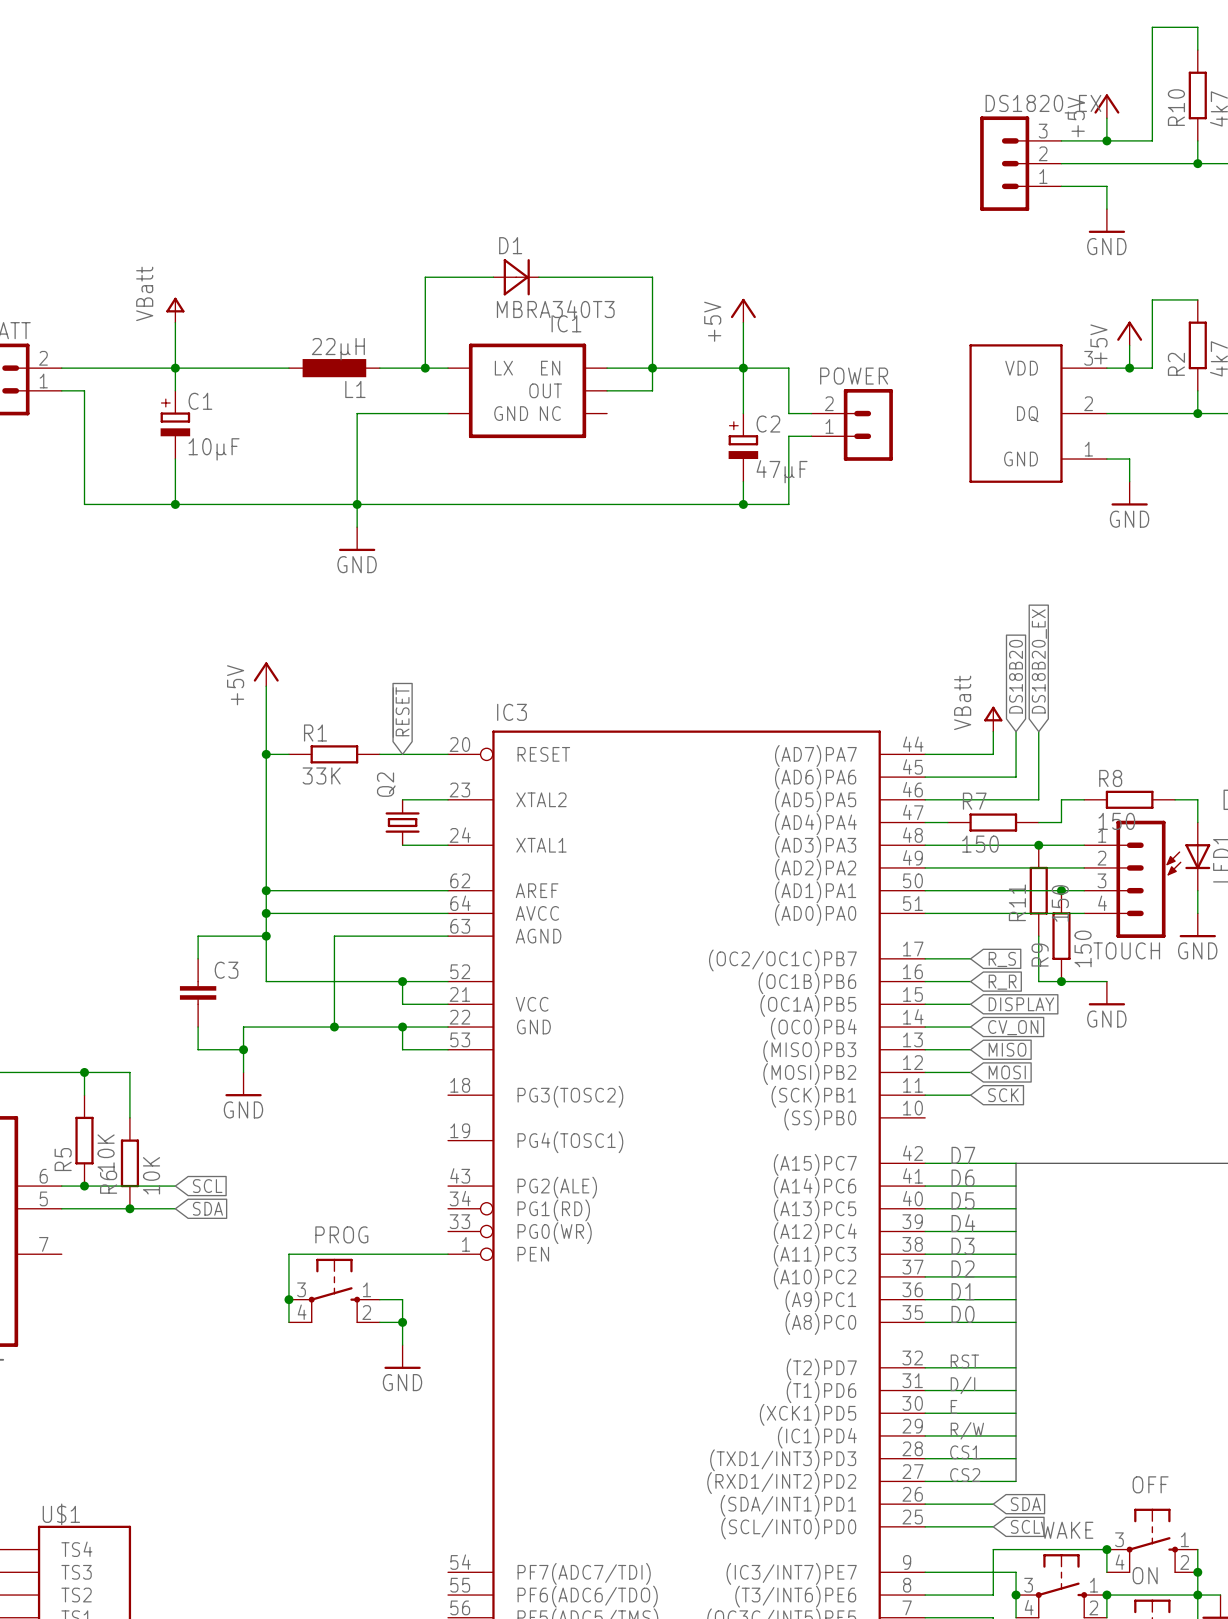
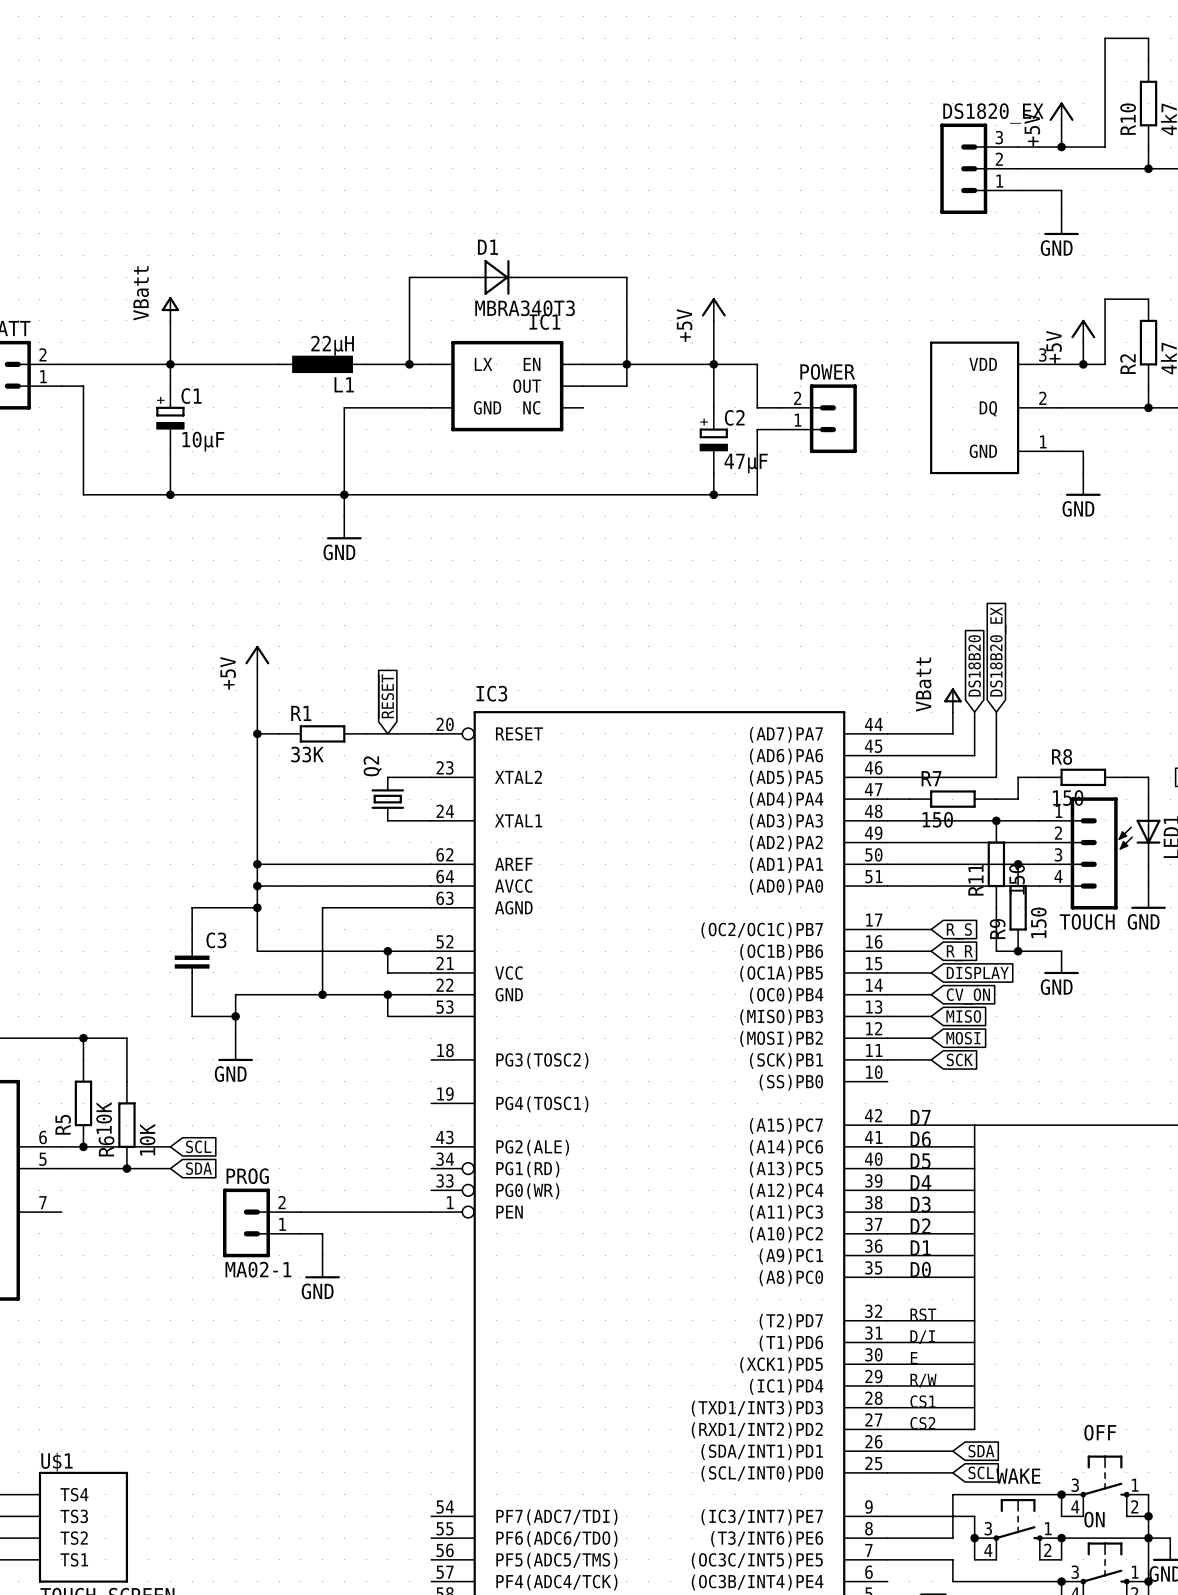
wire: (311, 1254) (288, 1254) (288, 1322) -> none
PROG: none -> MA02-1 (261, 1222)
wire: none -> (300, 1233) (322, 1233) (322, 1255)
PROG: (334, 1290) -> none
junction: (288, 1299) -> none
wire: (379, 1299) (402, 1299) (402, 1345) -> none
wire: (379, 1322) (402, 1322) -> none
junction: (402, 1322) -> none
power symbol position: GND (402, 1357) -> GND (322, 1266)

